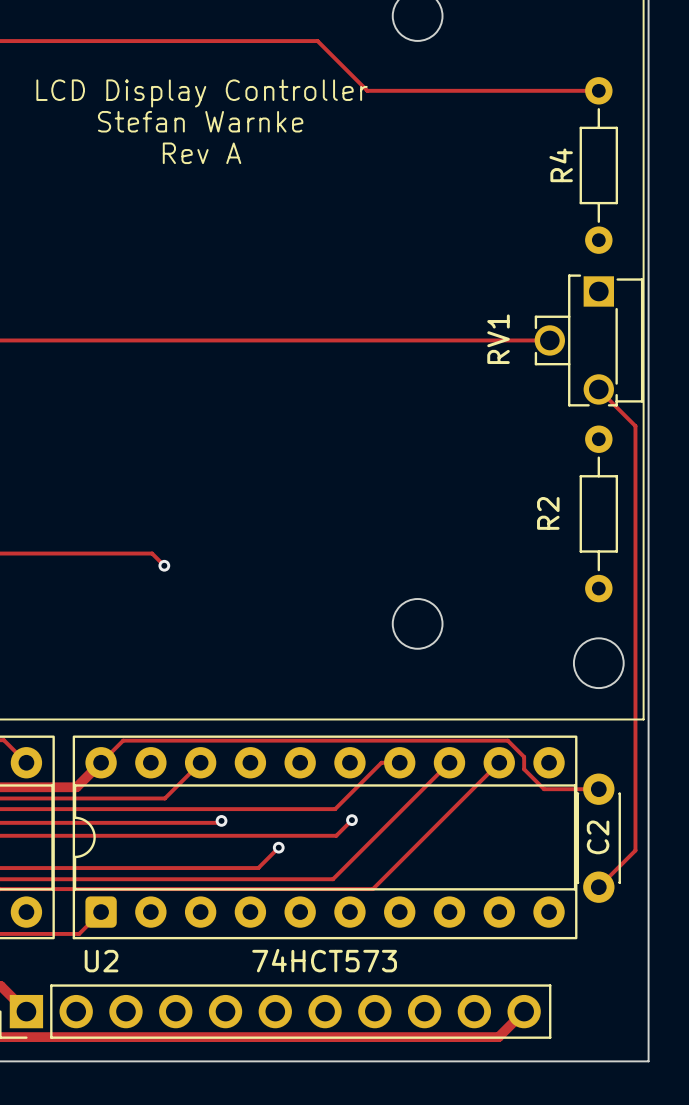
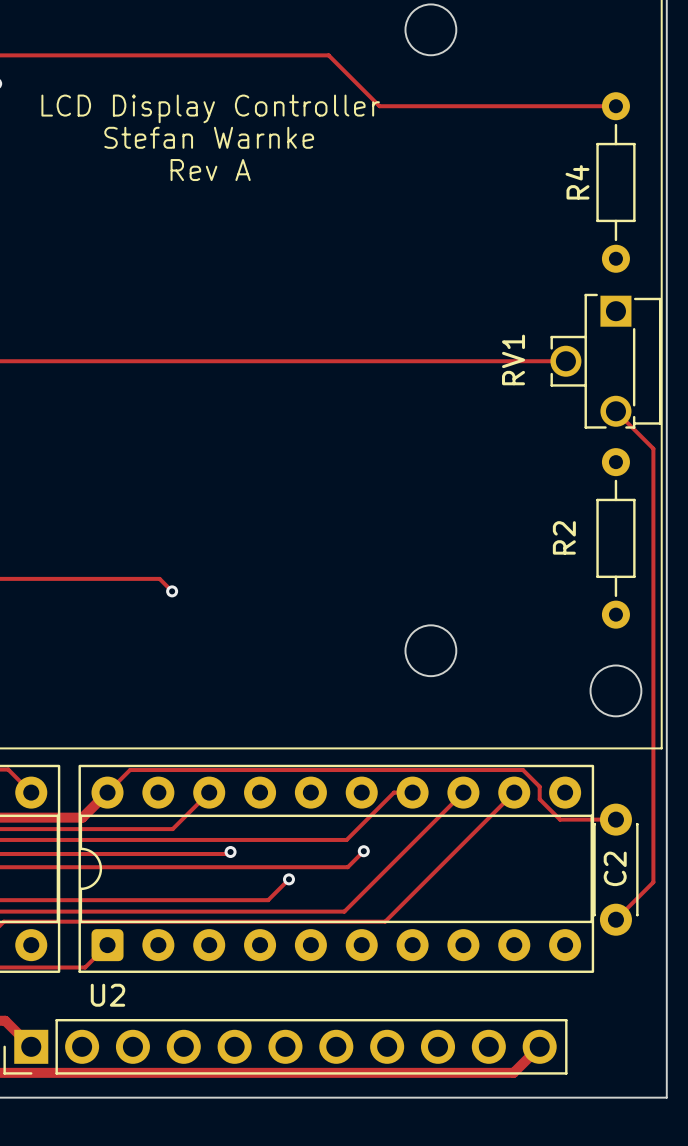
U2 value: 74HCT573 (324, 960) -> none

